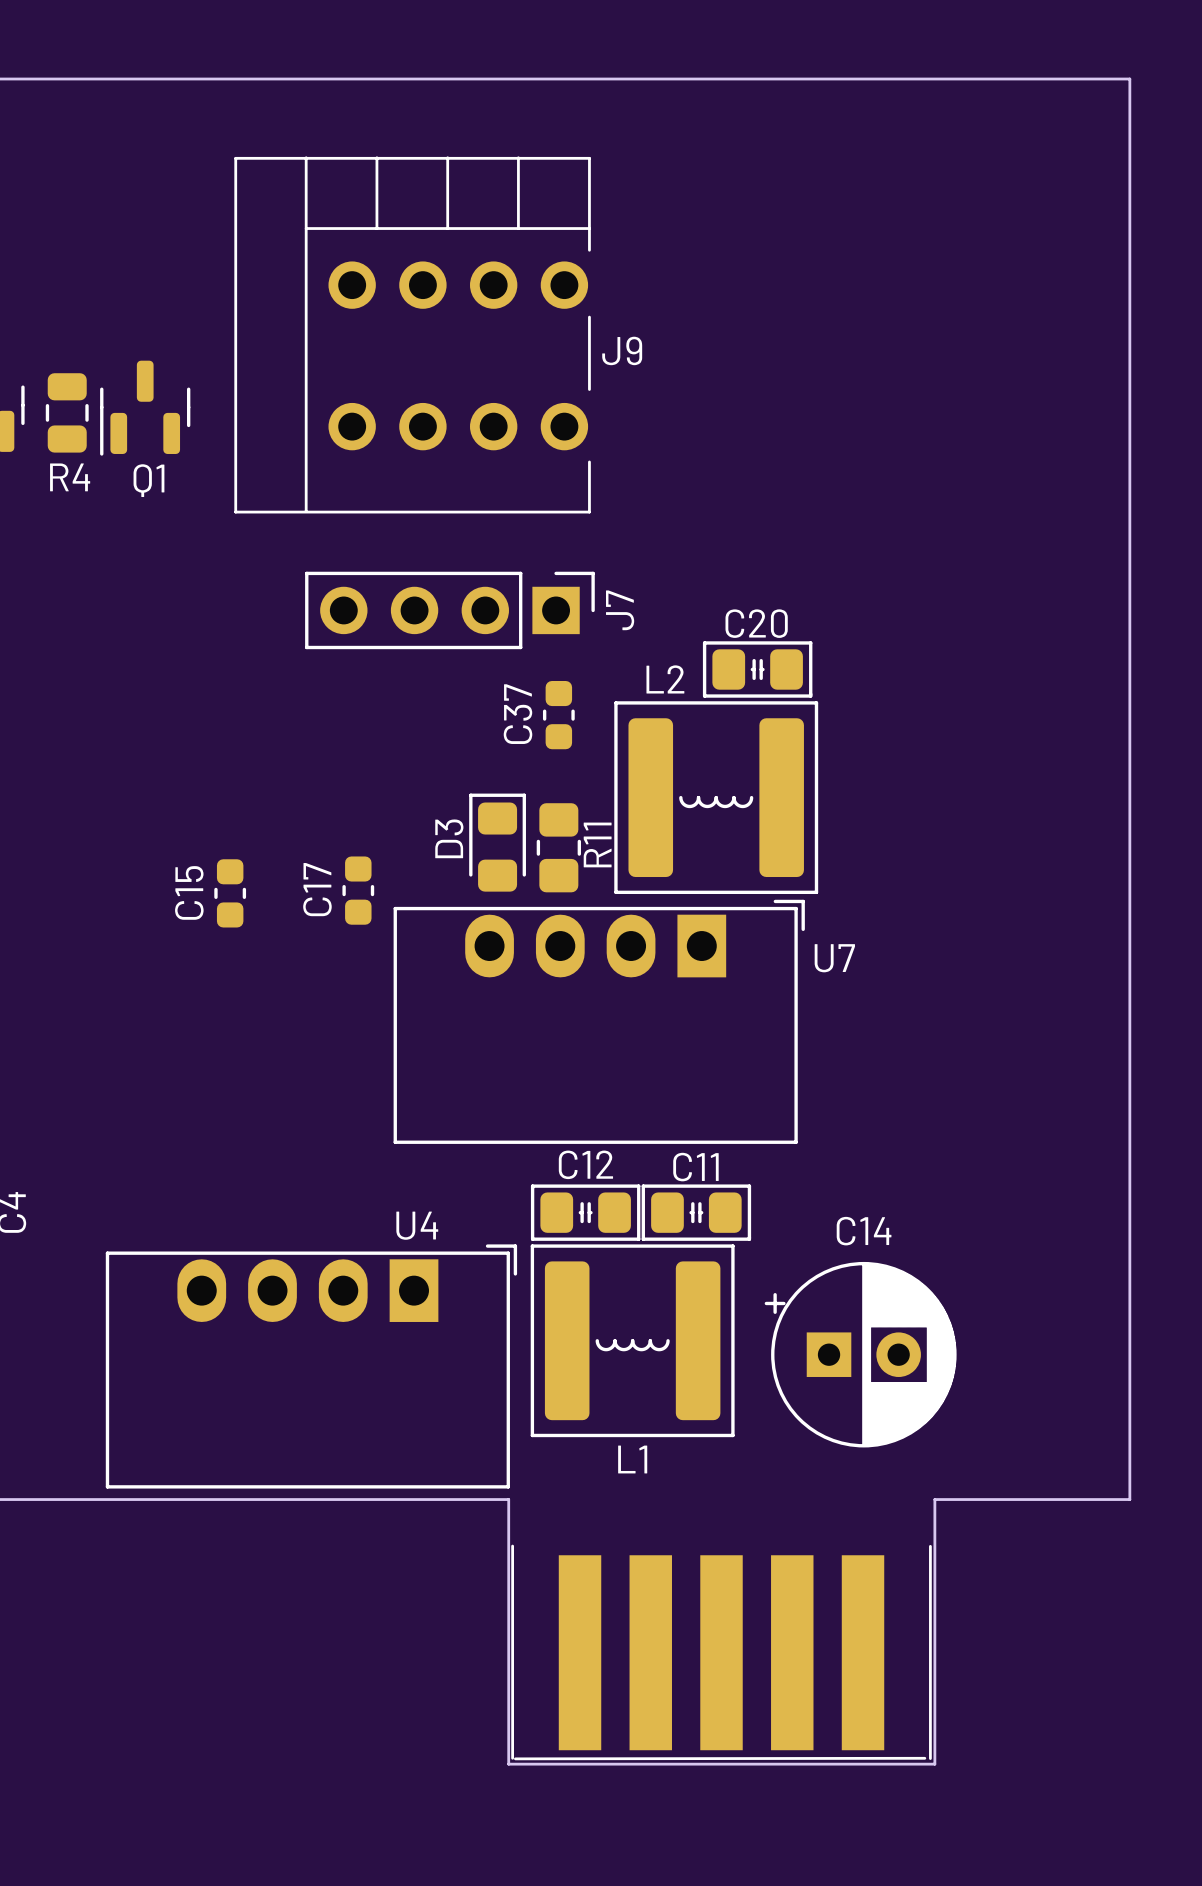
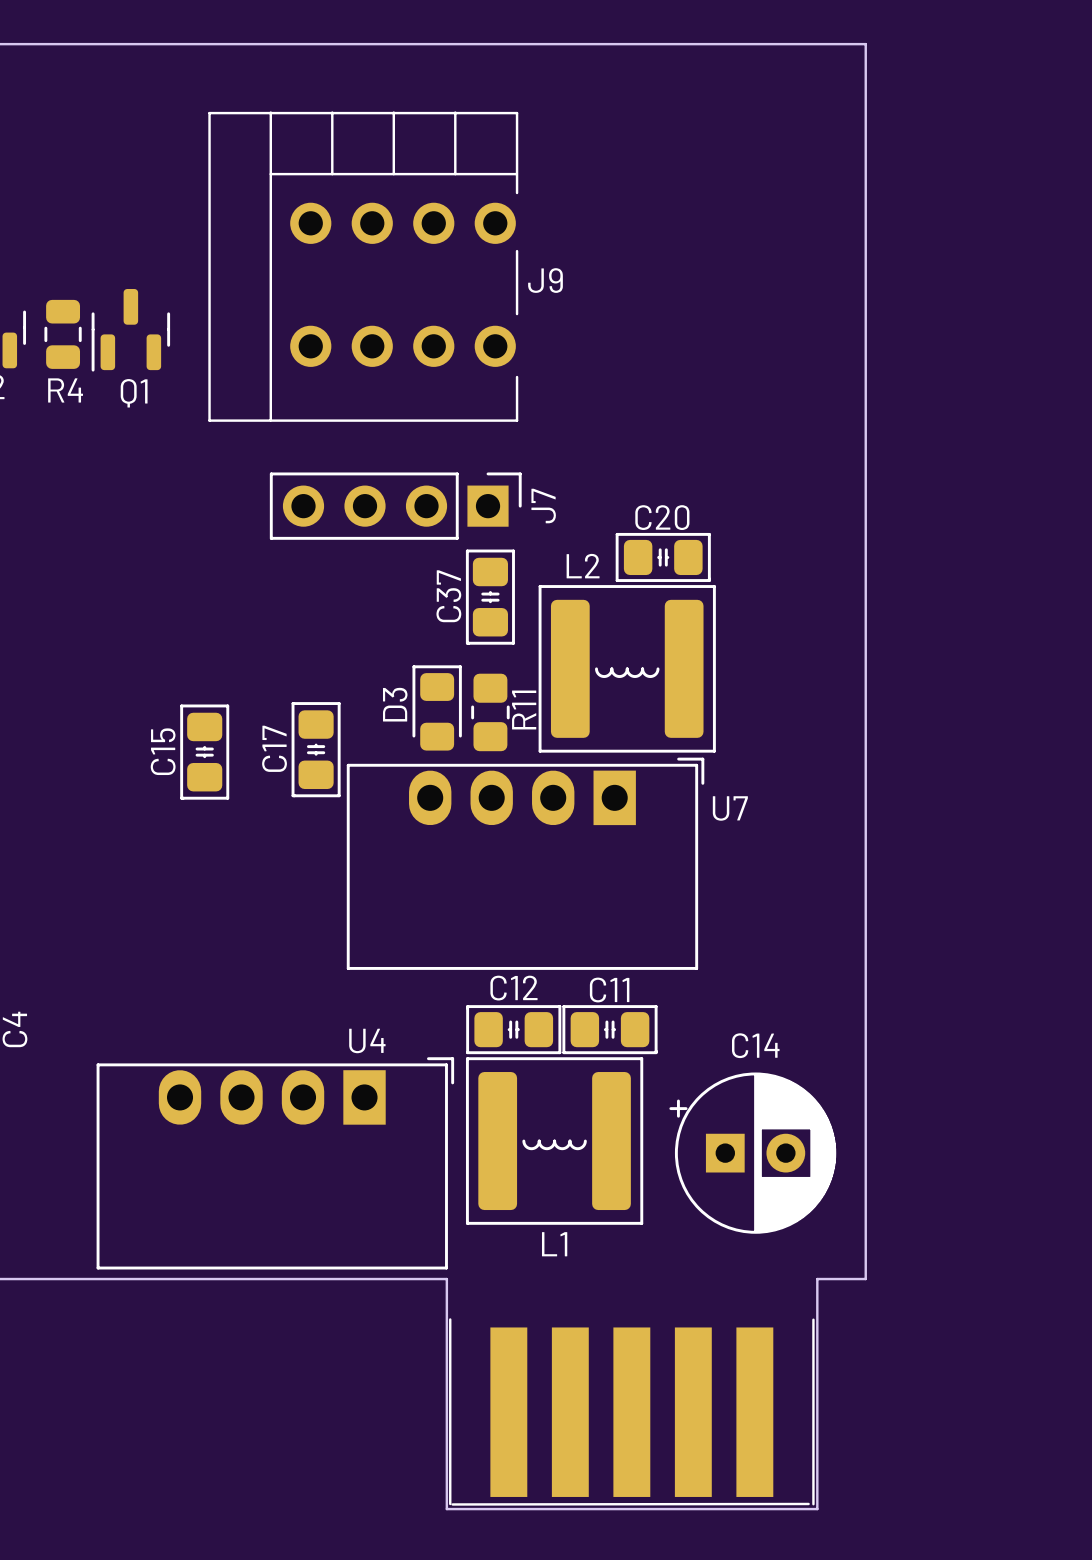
board edge: (990, 79) (1129, 79) (1129, 1499) (990, 1499) -> (865, 44) (865, 1279)
C37 footprint: [542, 680, 575, 750] -> [465, 549, 515, 645]
C17 footprint: [342, 856, 375, 925] -> [291, 702, 341, 798]
C15 footprint: [214, 859, 247, 928] -> [180, 704, 230, 800]

